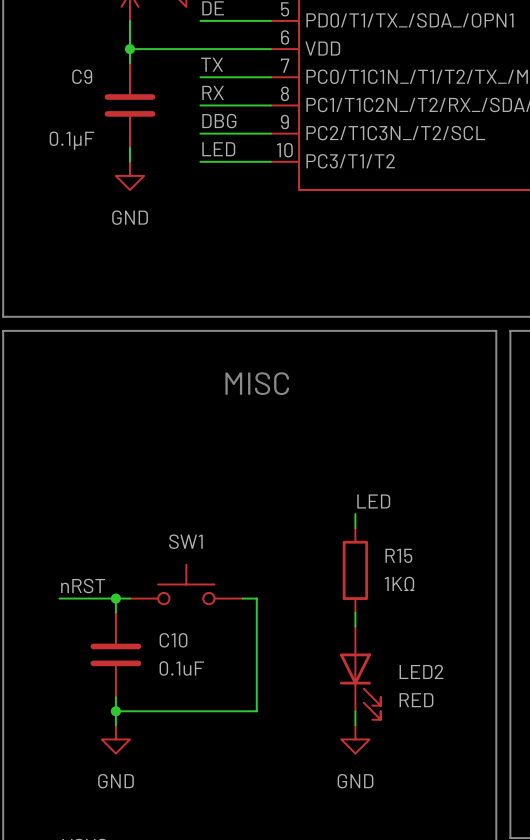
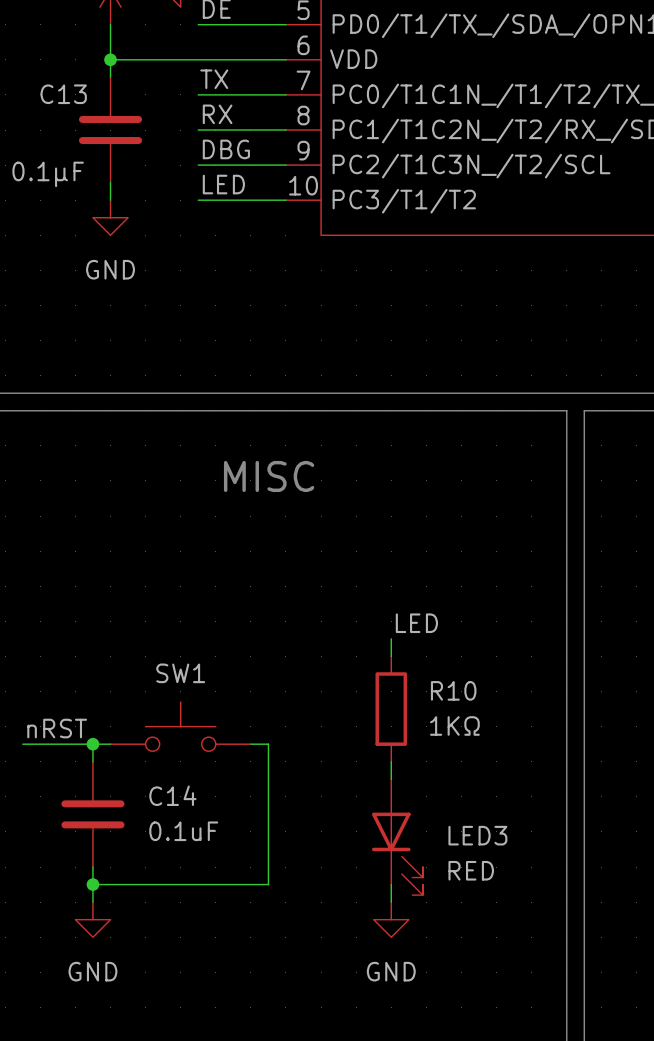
C9 name: C9 (82, 76) -> C13 (63, 94)
R15 name: R15 (398, 555) -> R10 (453, 690)
C10 name: C10 (173, 640) -> C14 (172, 795)
LED2 name: LED2 (421, 671) -> LED3 (477, 835)

